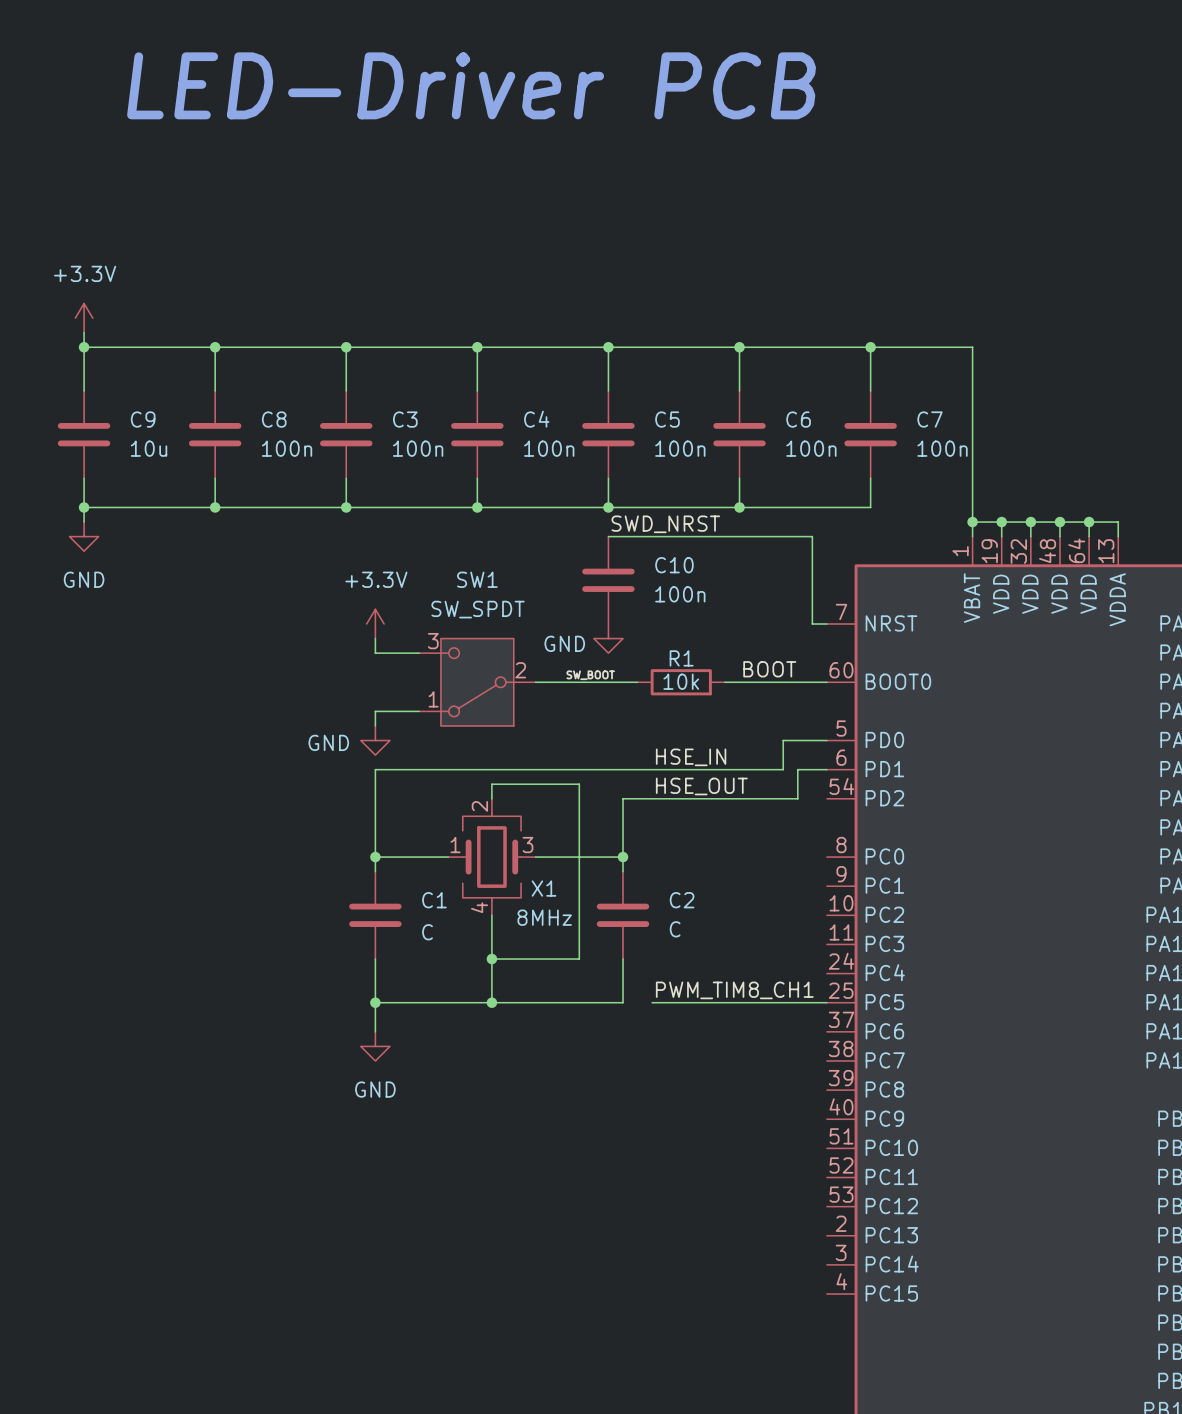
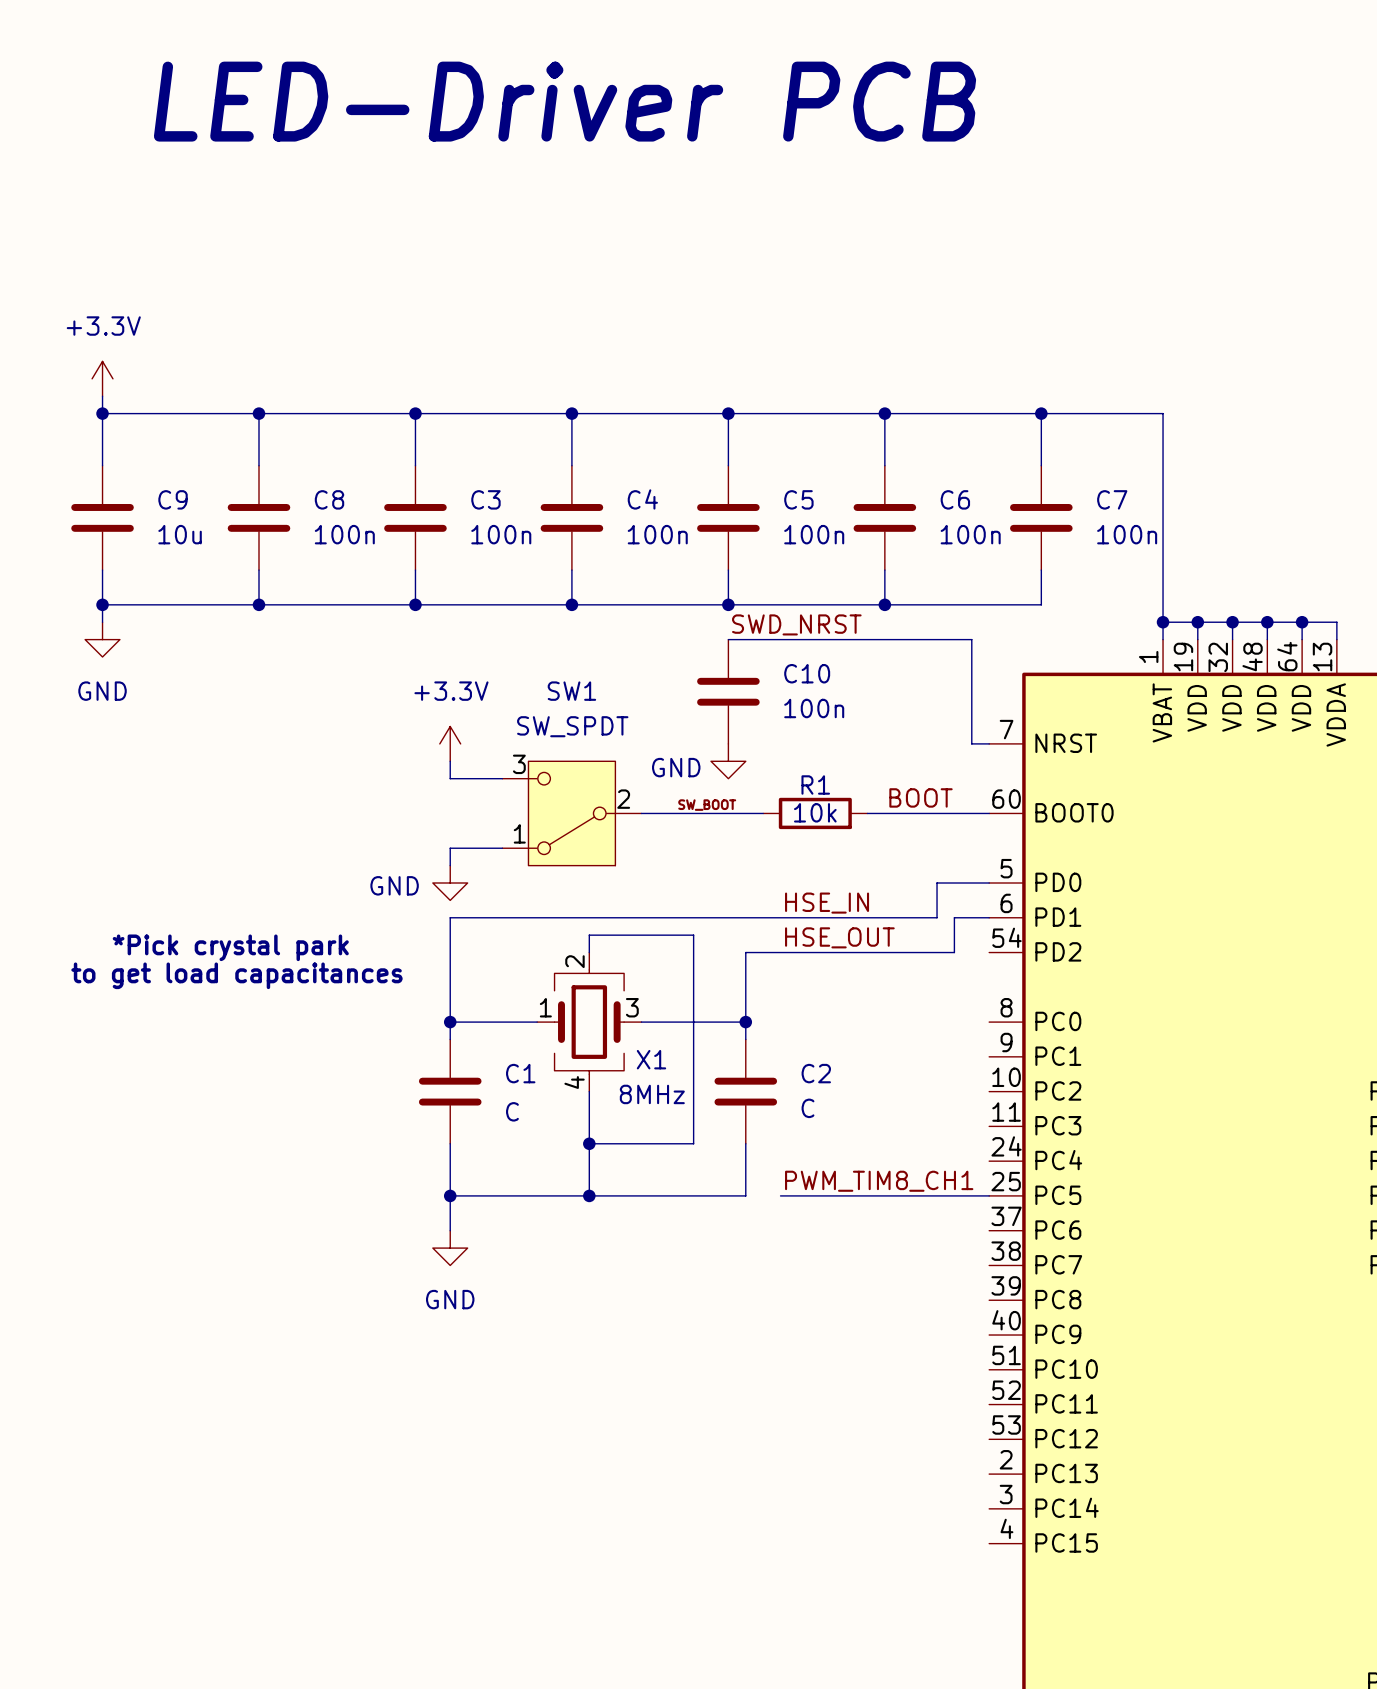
text: none -> *Pick crystal park (230, 947)
text: none -> to get load capacitances (236, 975)

